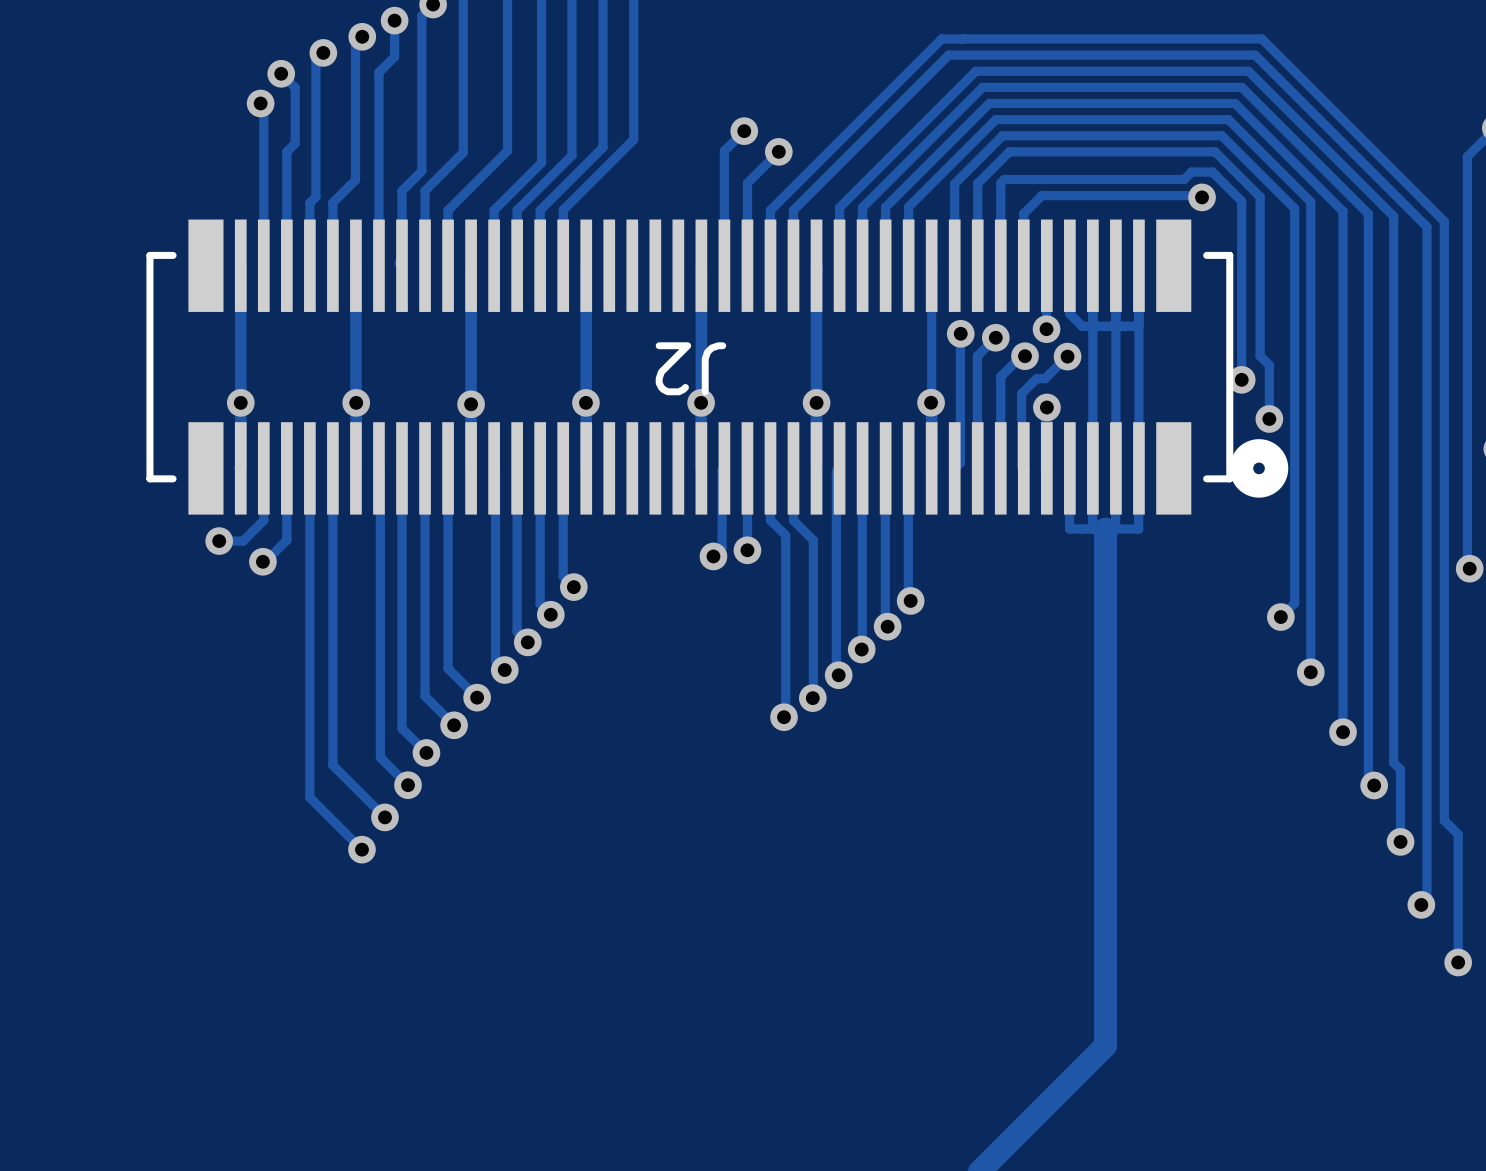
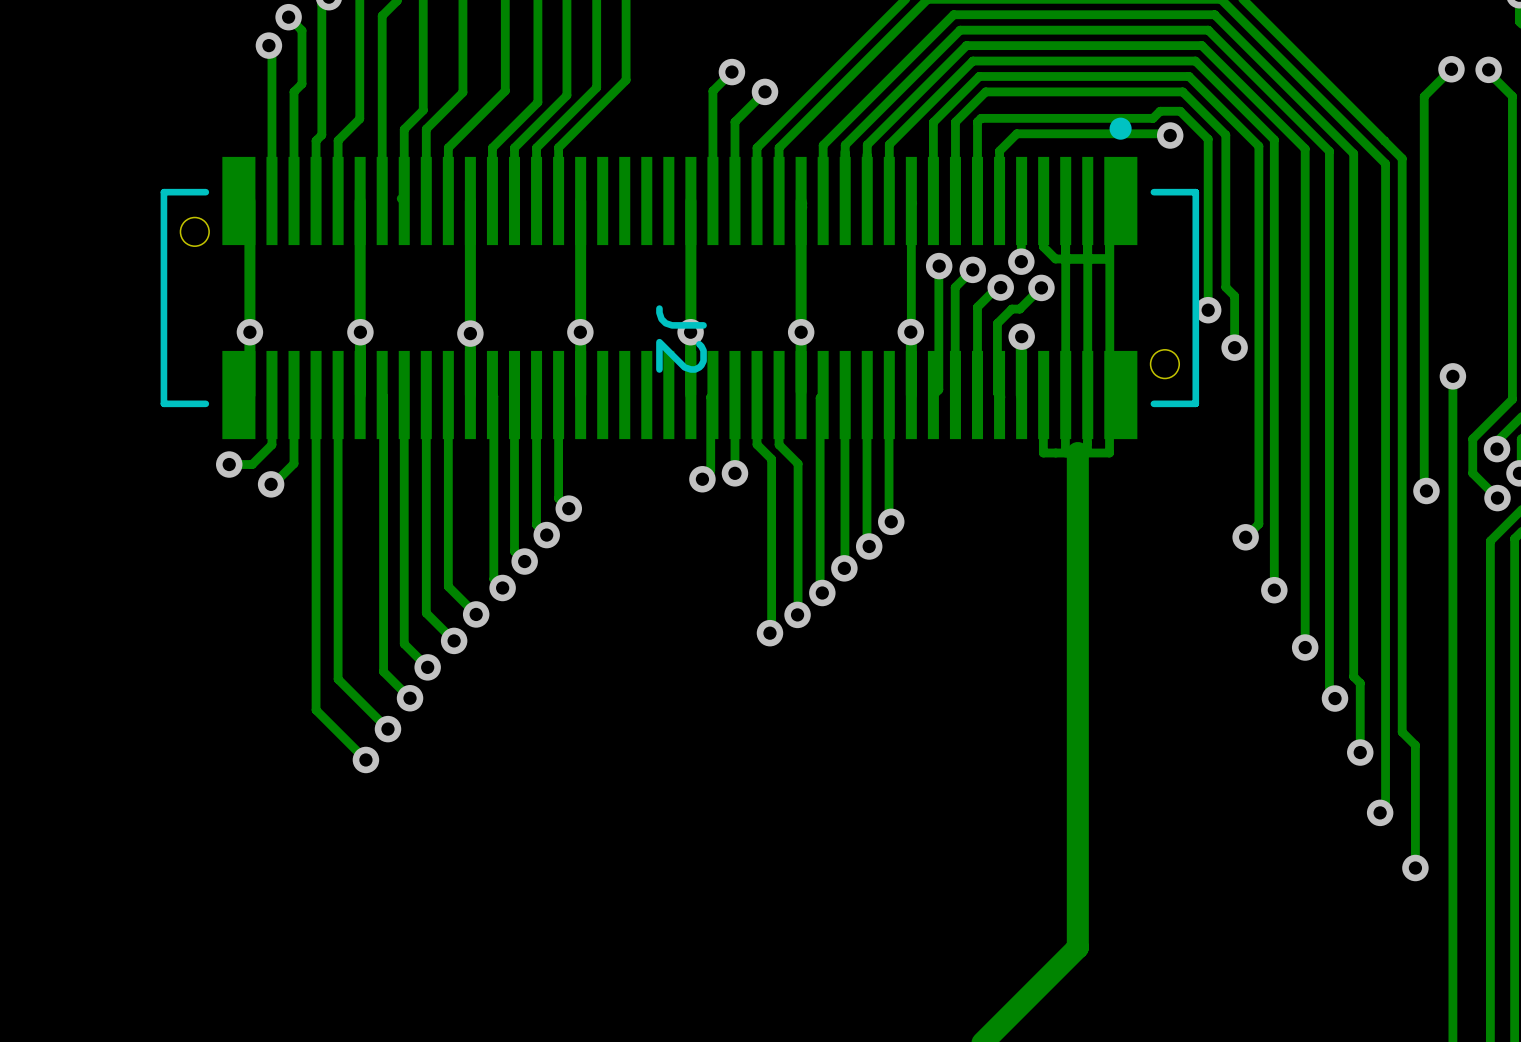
J2 footprint: [146, 219, 1289, 515] -> [160, 117, 1200, 440]

